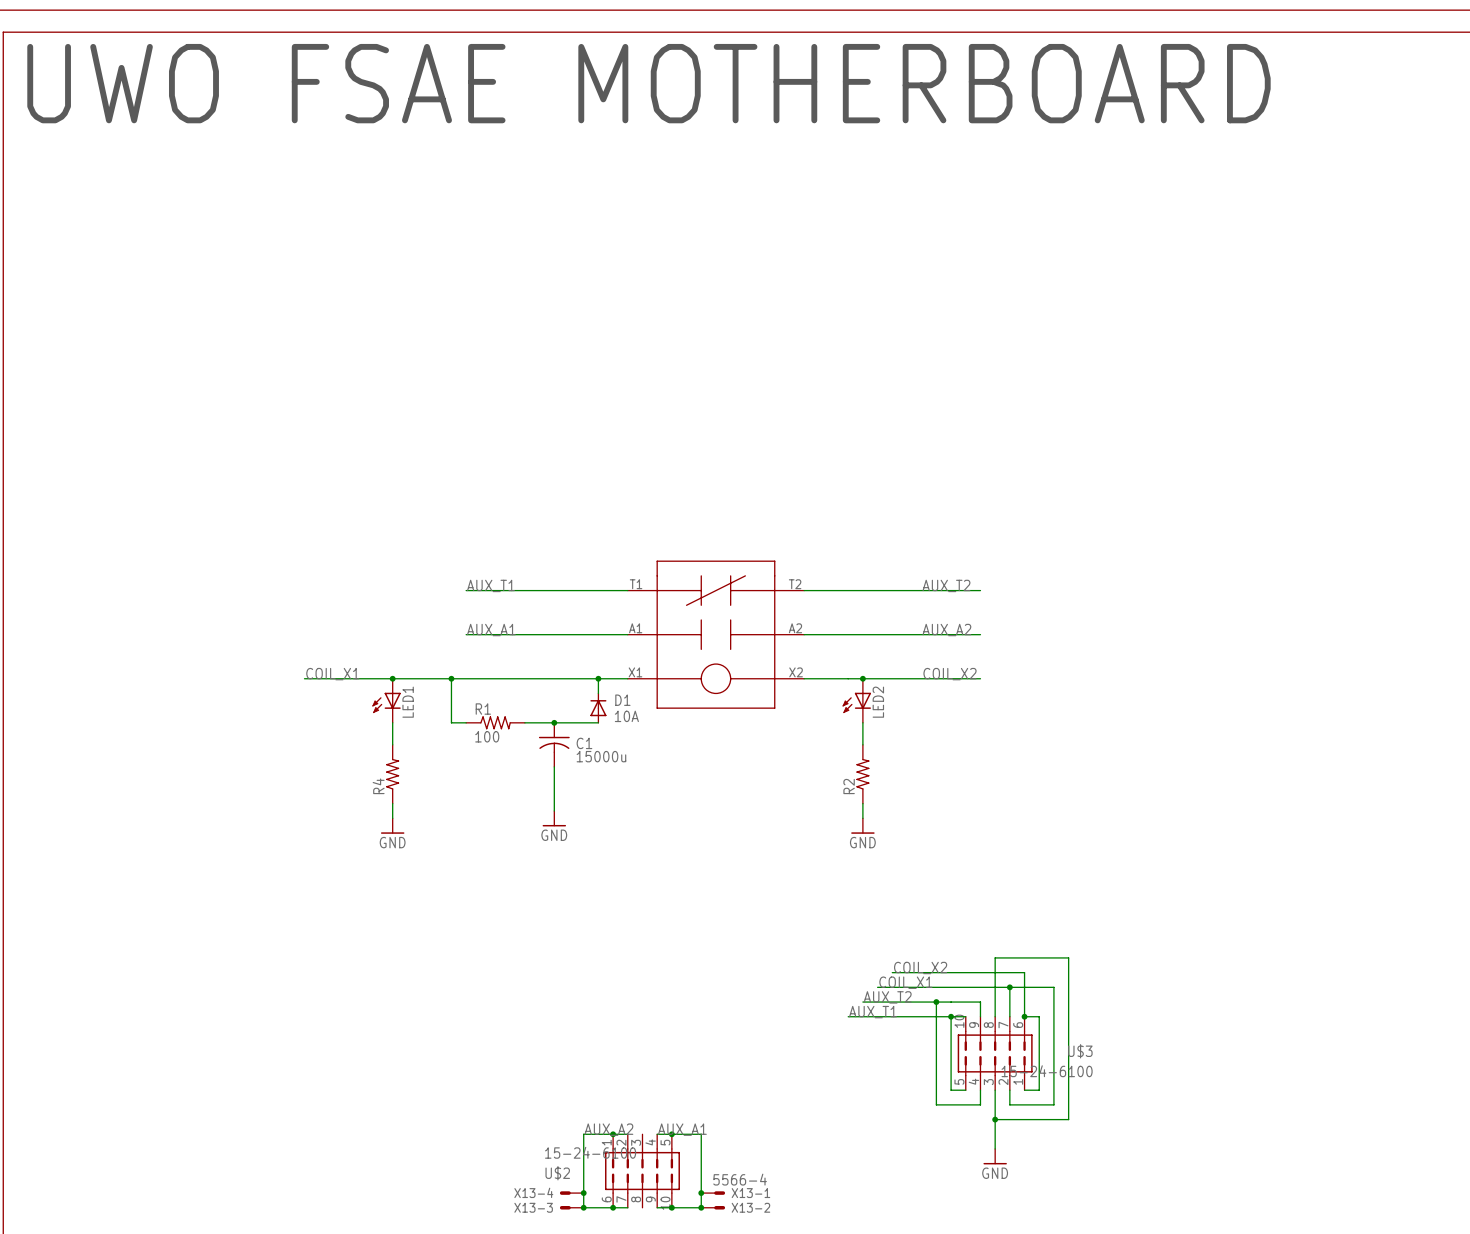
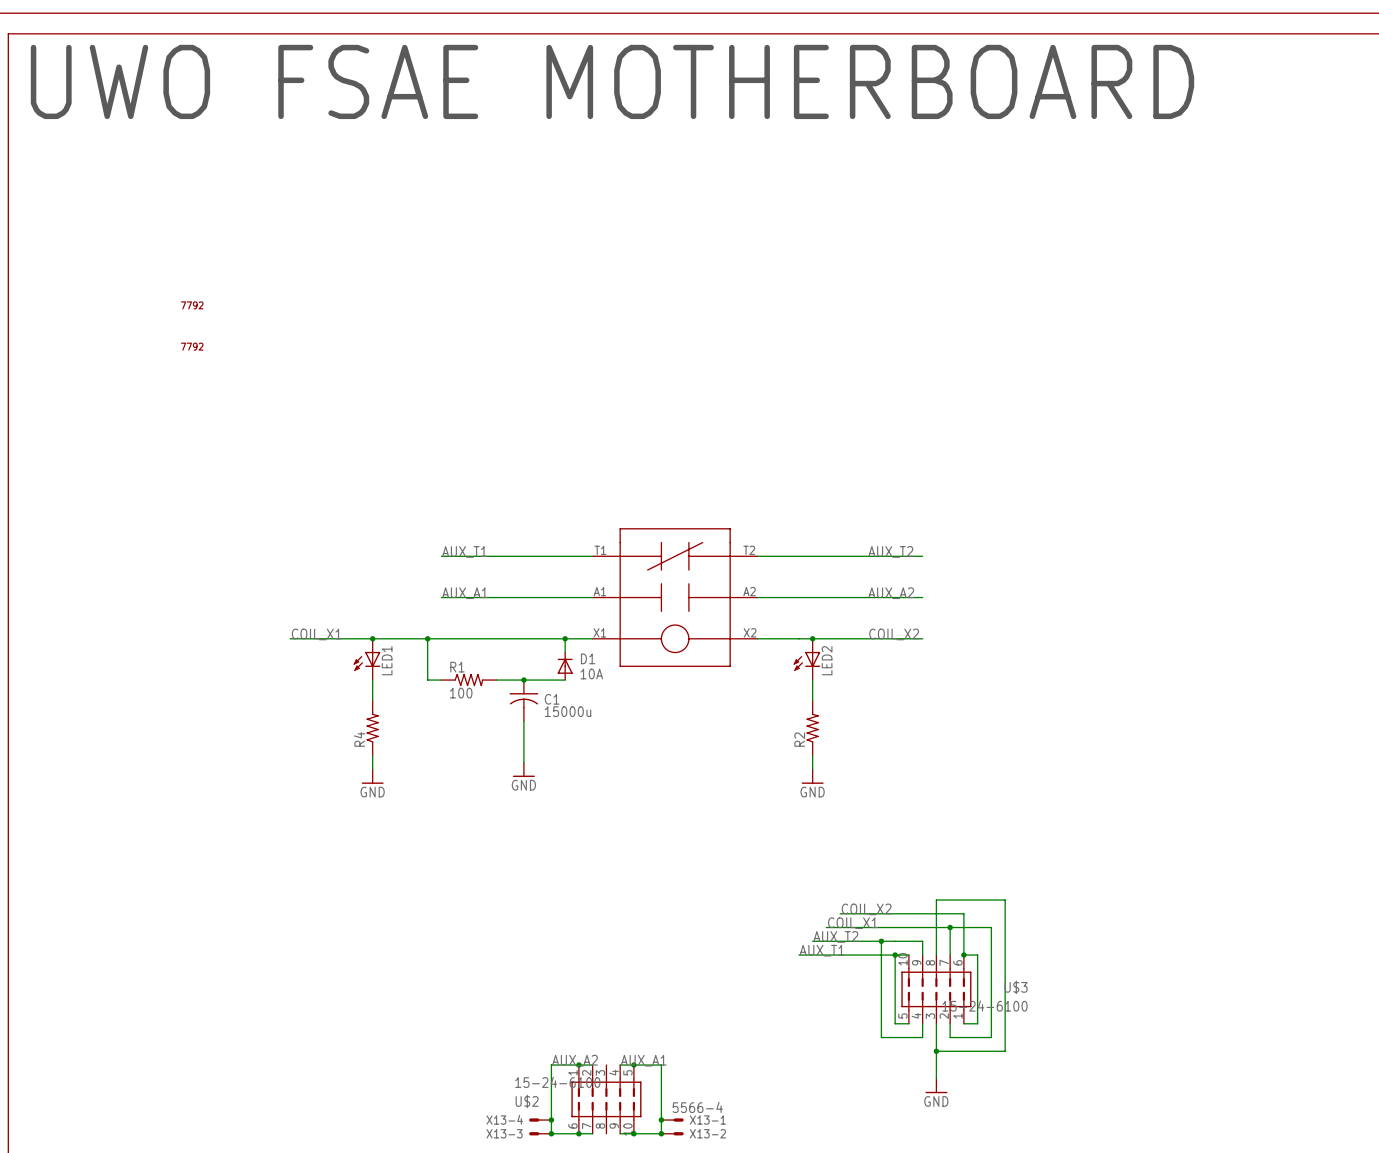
part: none -> (192, 305)
part: none -> (192, 346)

